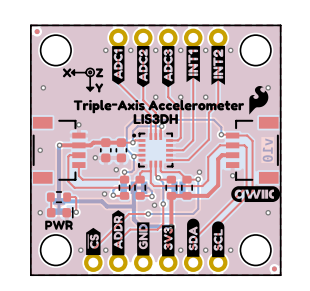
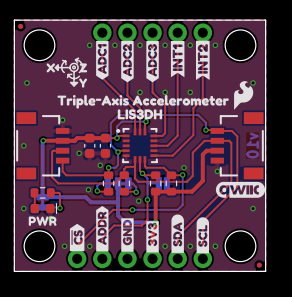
line: none -> (78, 58) (75, 59)
line: none -> (62, 60) (65, 61)
line: none -> (65, 61) (65, 64)
line: none -> (65, 61) (61, 66) (64, 72)
line: none -> (77, 62) (75, 59) (80, 61) (82, 65) (79, 72)
line: none -> (68, 74) (67, 77)
line: none -> (68, 74) (73, 78) (79, 76)
line: none -> (71, 74) (68, 74)

